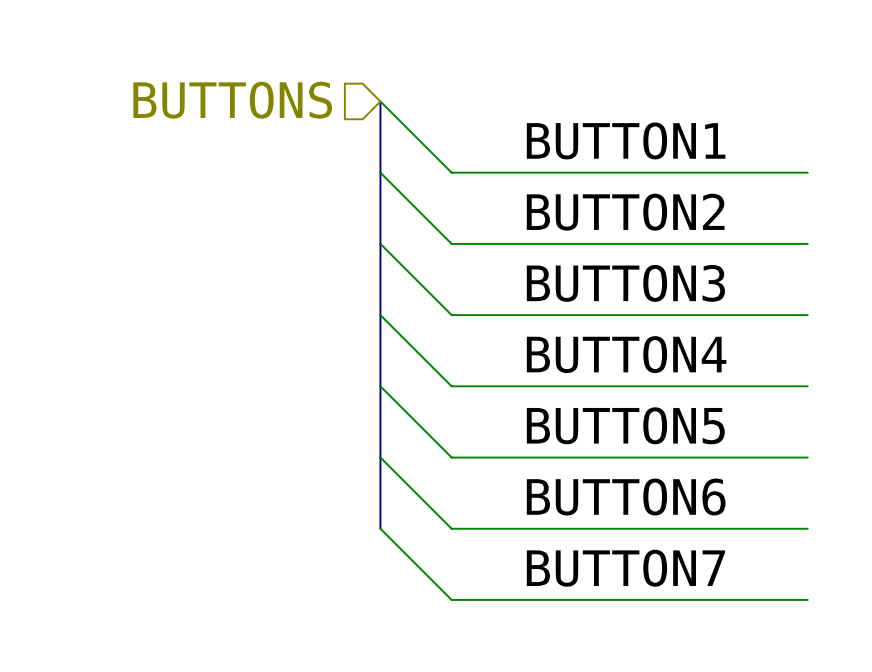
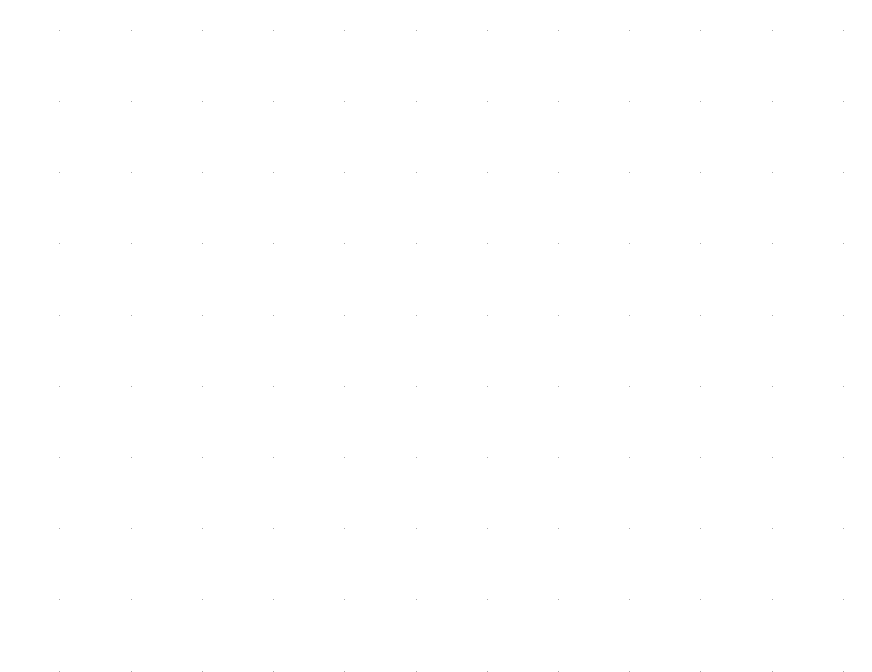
hierarchical label: BUTTONS (232, 100) -> none
wire: (380, 101) (451, 172) (807, 172) -> none
bus: (380, 101) (380, 528) -> none
label: BUTTON1 (626, 140) -> none
wire: (380, 172) (451, 243) (807, 243) -> none
label: BUTTON2 (625, 212) -> none
wire: (380, 243) (451, 315) (807, 315) -> none
label: BUTTON3 (625, 283) -> none
wire: (380, 315) (451, 386) (807, 386) -> none
label: BUTTON4 (626, 354) -> none
wire: (380, 386) (451, 457) (807, 457) -> none
label: BUTTON5 (625, 425) -> none
wire: (380, 457) (451, 528) (807, 528) -> none
label: BUTTON6 (626, 497) -> none
wire: (380, 528) (451, 599) (807, 599) -> none
label: BUTTON7 (625, 568) -> none

